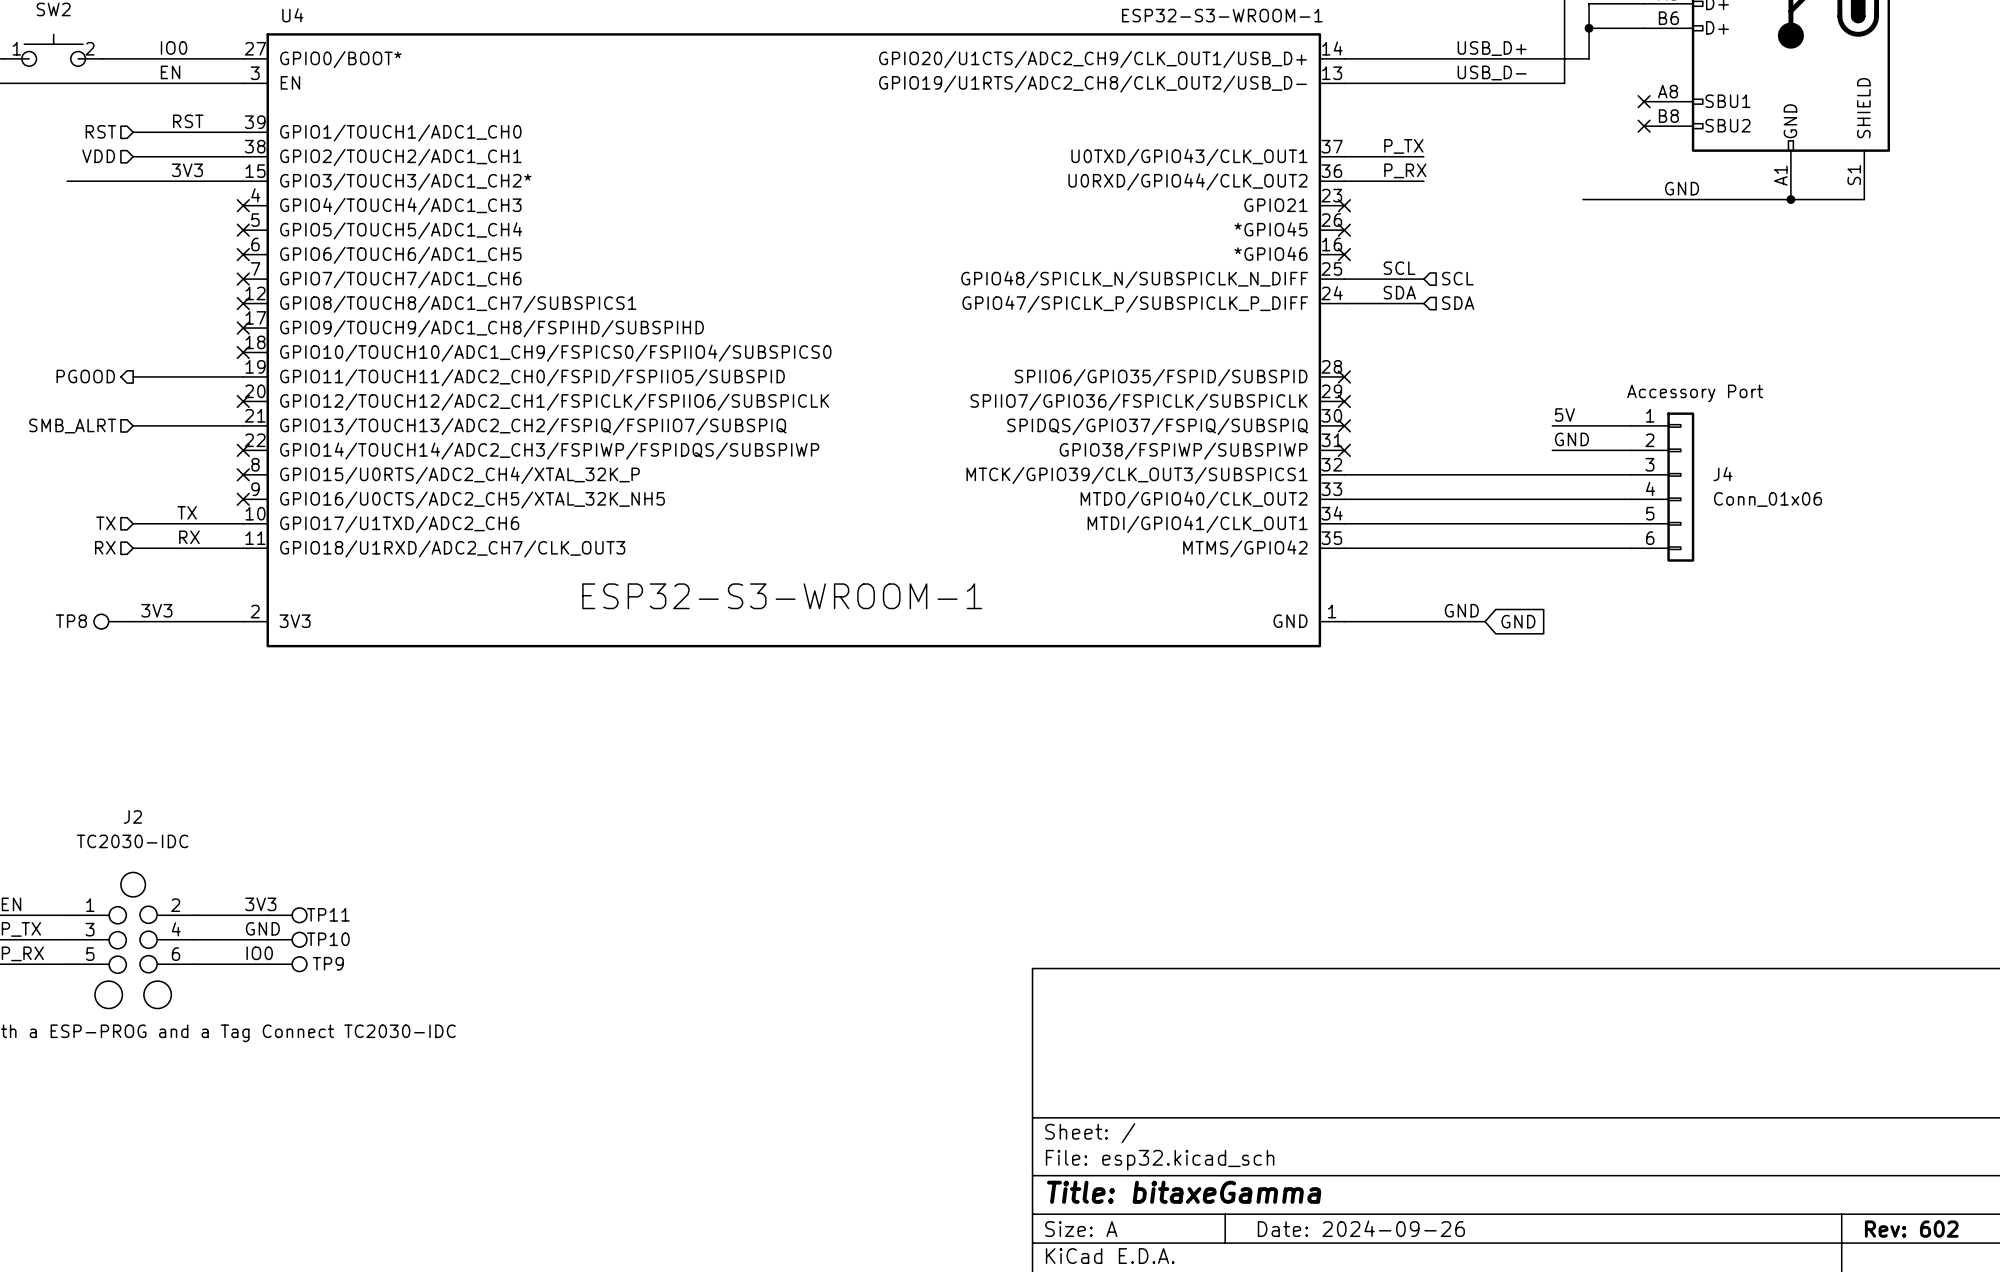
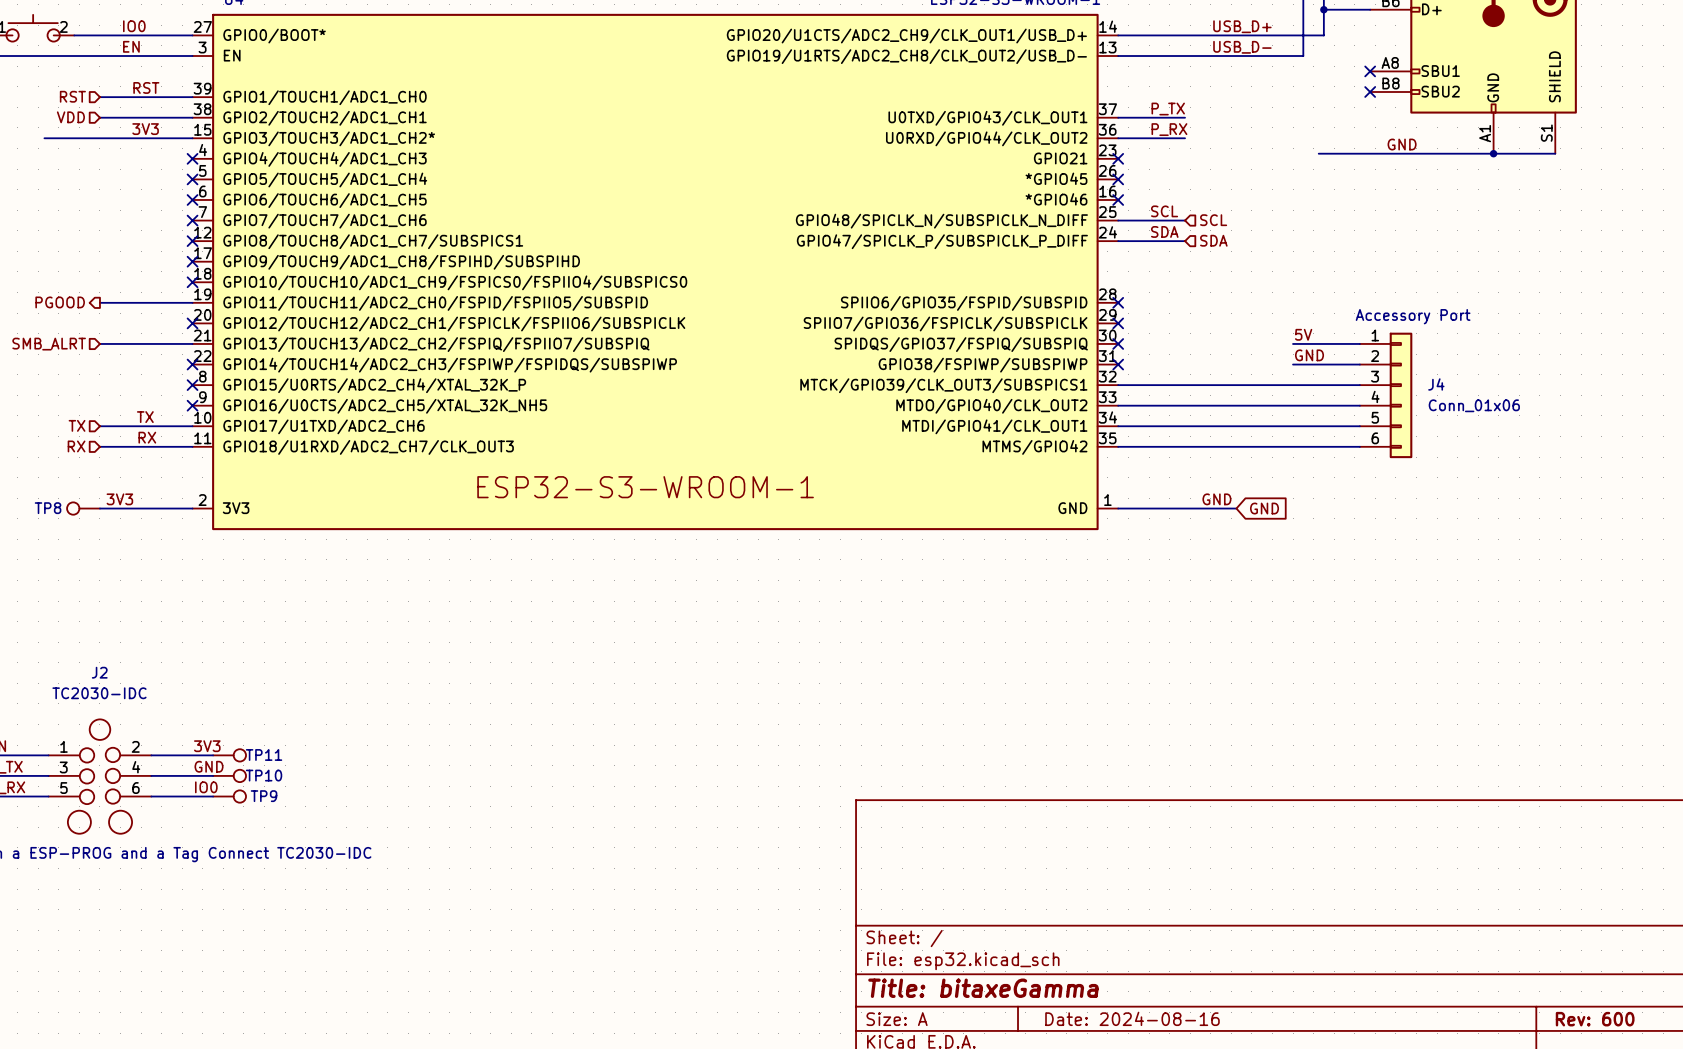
title block: Date: 2024-09-26 (1361, 1228) -> Date: 2024-08-16 (1132, 1018)
title block: Rev: 602 (1911, 1229) -> Rev: 600 (1595, 1019)

